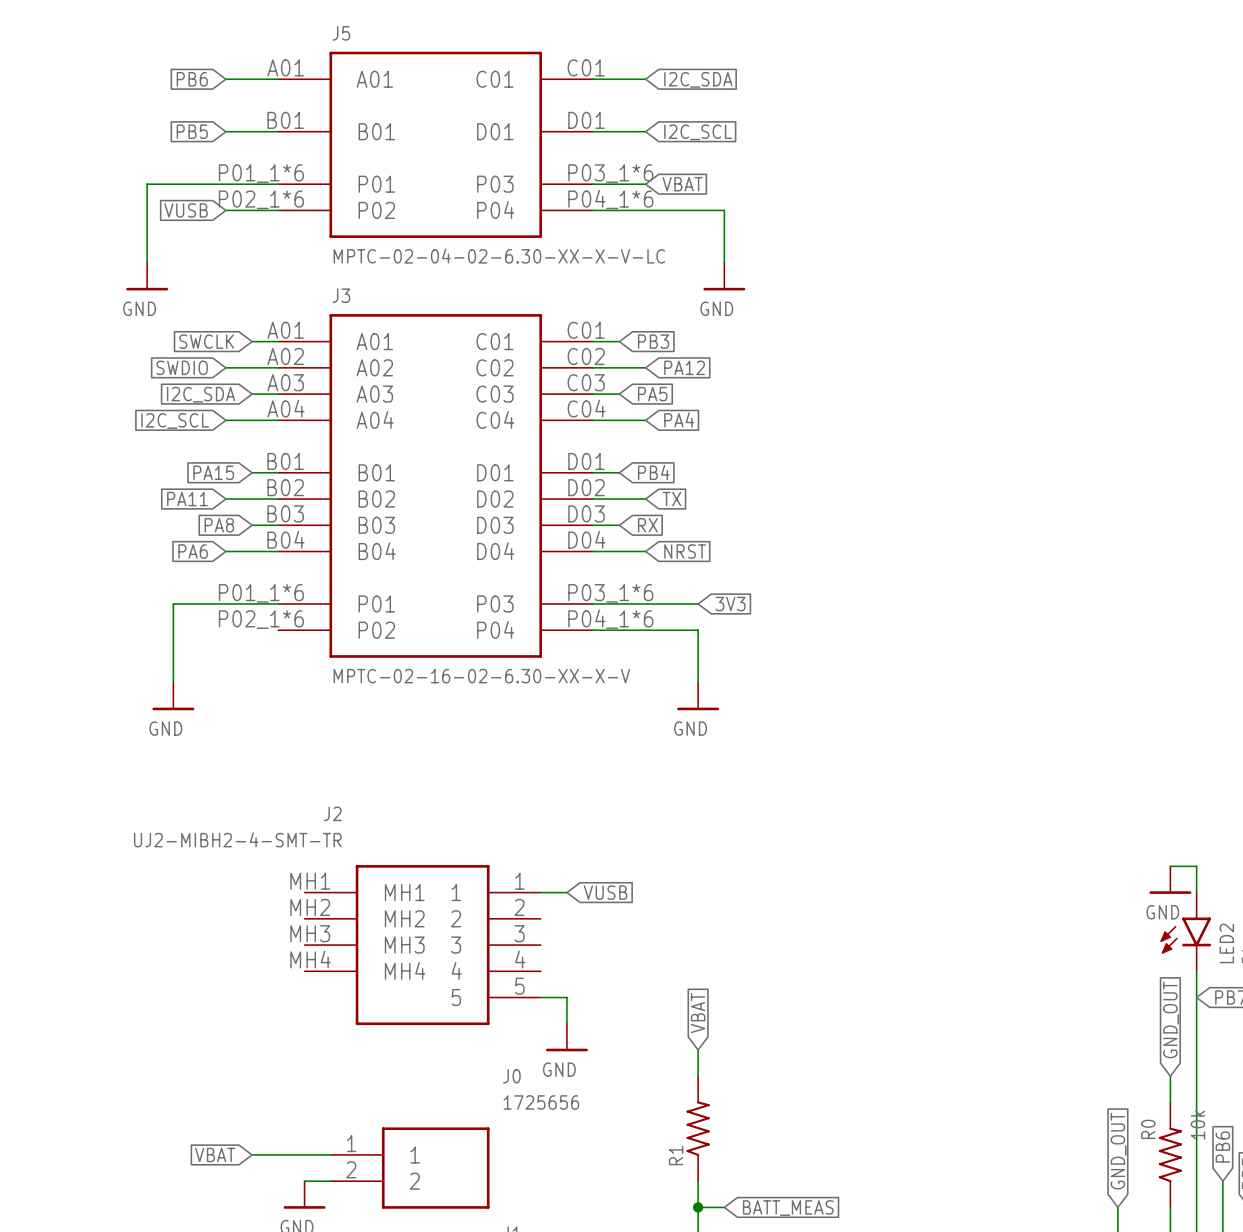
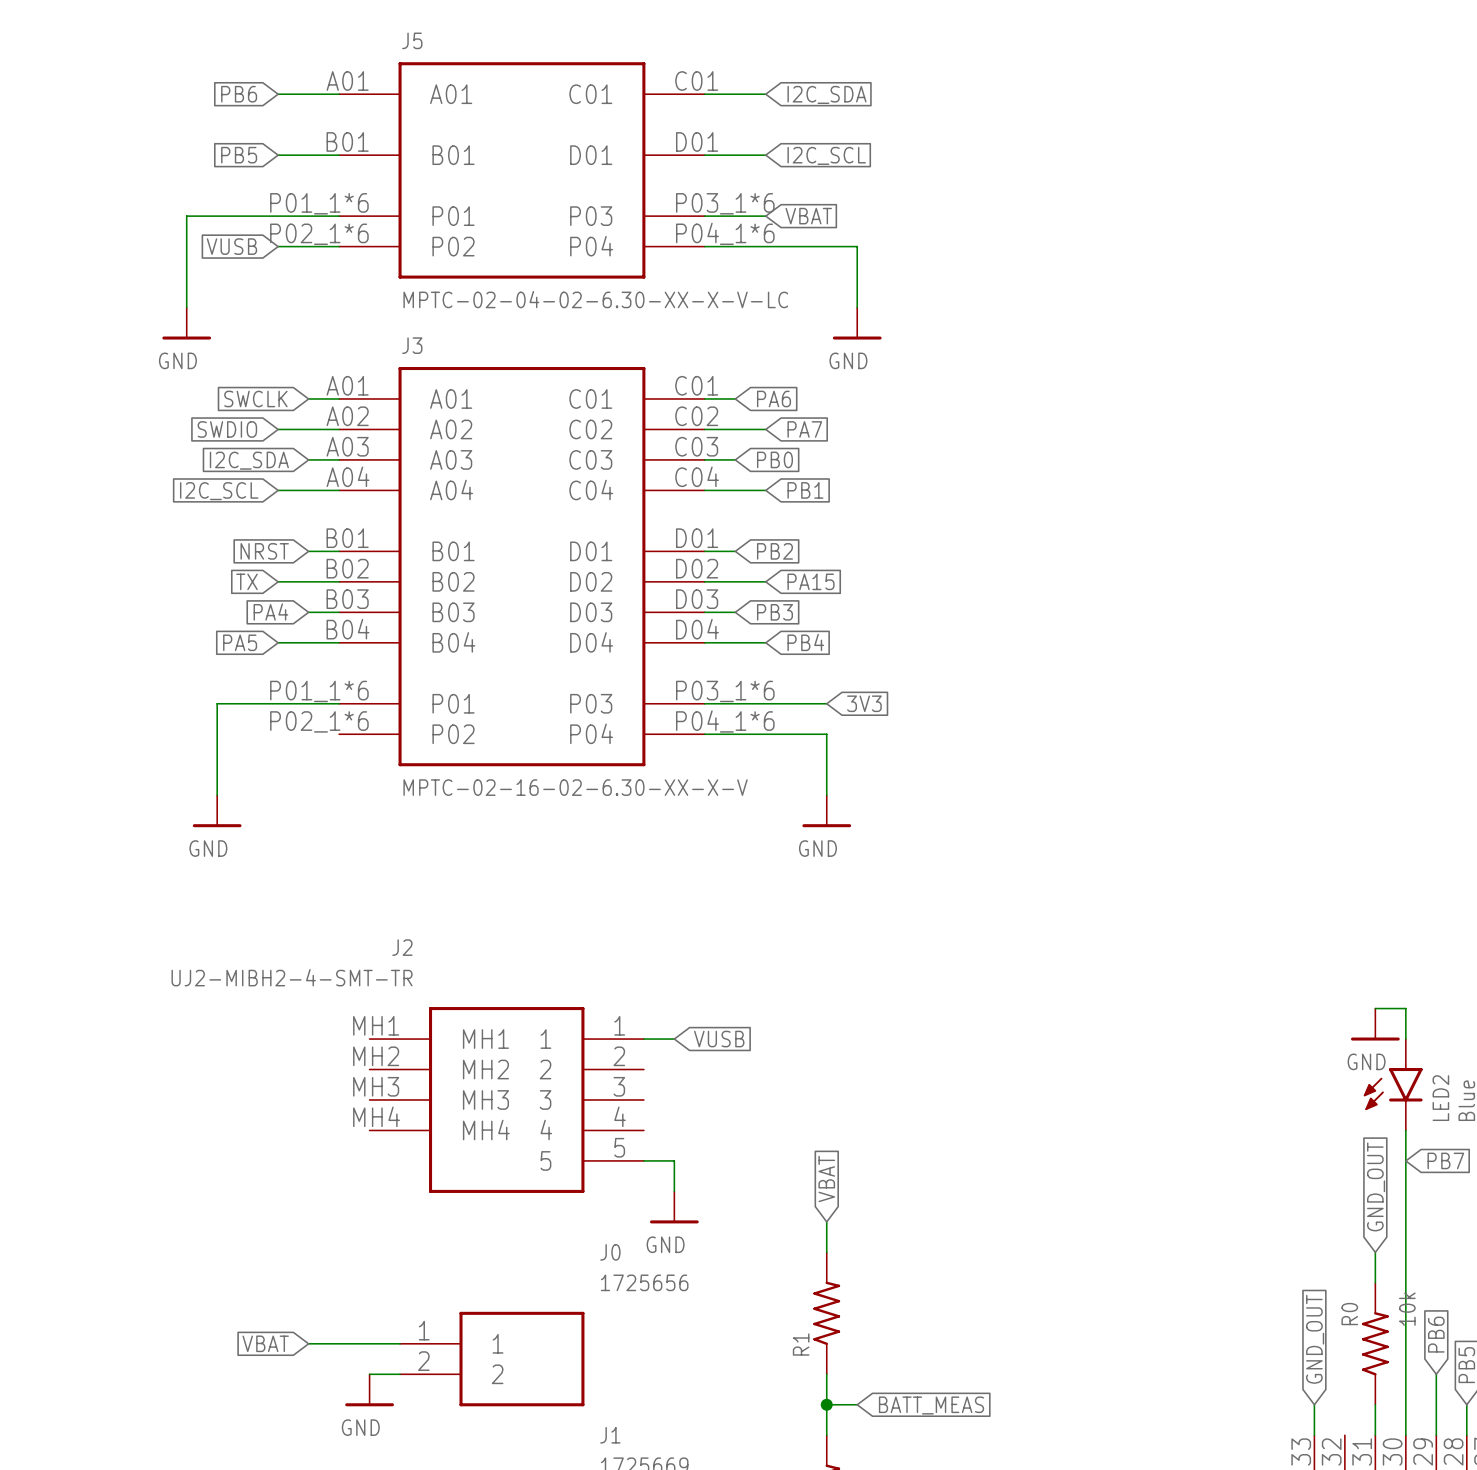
global label: PB3 (653, 341) -> PA6 (774, 398)
global label: PA12 (684, 367) -> PA7 (804, 429)
global label: PA5 (652, 394) -> PB0 (774, 459)
global label: PA4 (679, 420) -> PB1 (805, 490)
global label: PA15 (213, 472) -> NRST (264, 551)
global label: PB4 (653, 472) -> PB2 (774, 551)
global label: PA11 (187, 499) -> TX (246, 581)
global label: TX (671, 499) -> PA15 (811, 581)
global label: PA8 (219, 525) -> PA4 (270, 611)
global label: RX (647, 525) -> PB3 (774, 612)
global label: PA6 (193, 551) -> PA5 (240, 642)
global label: NRST (685, 551) -> PB4 (805, 642)

